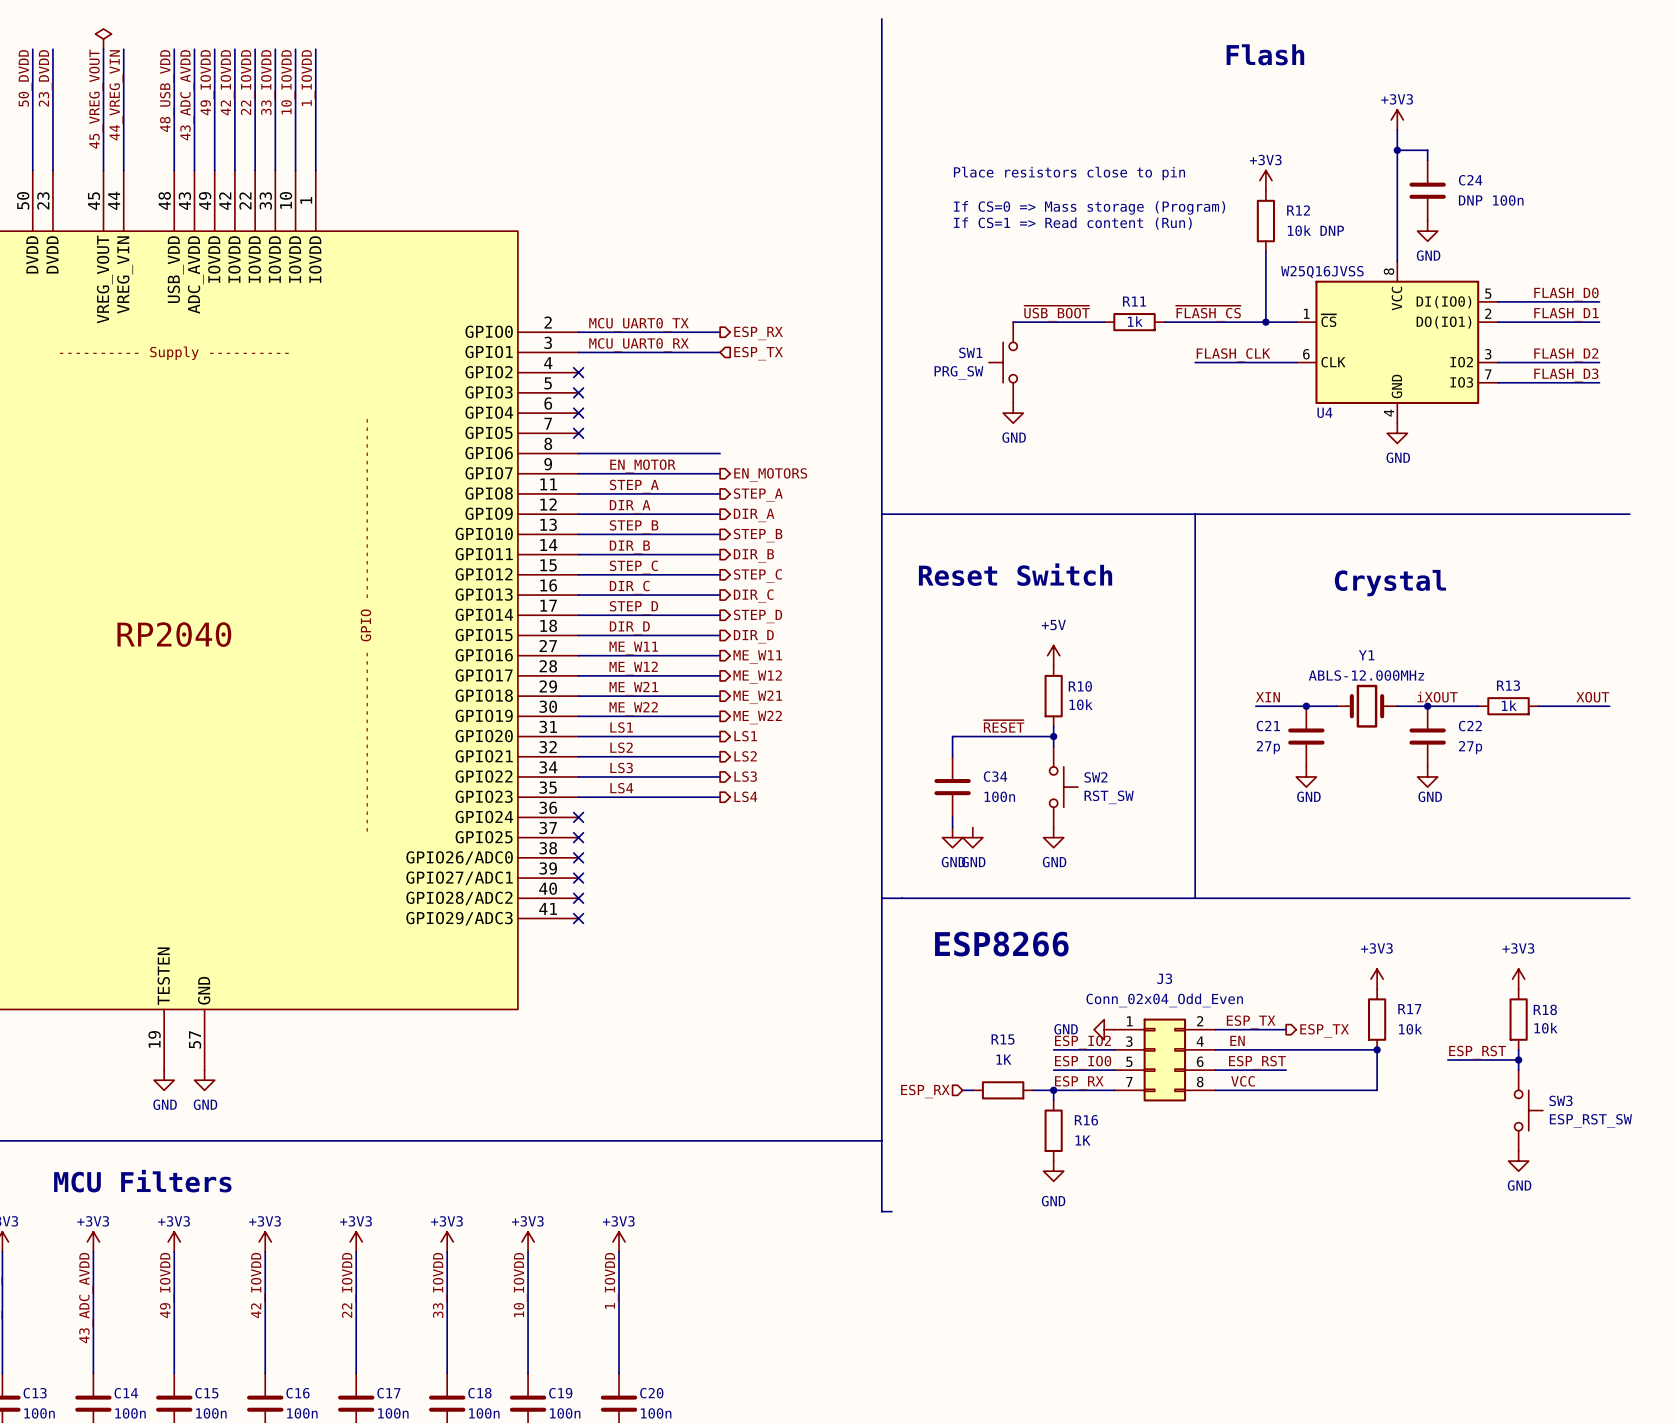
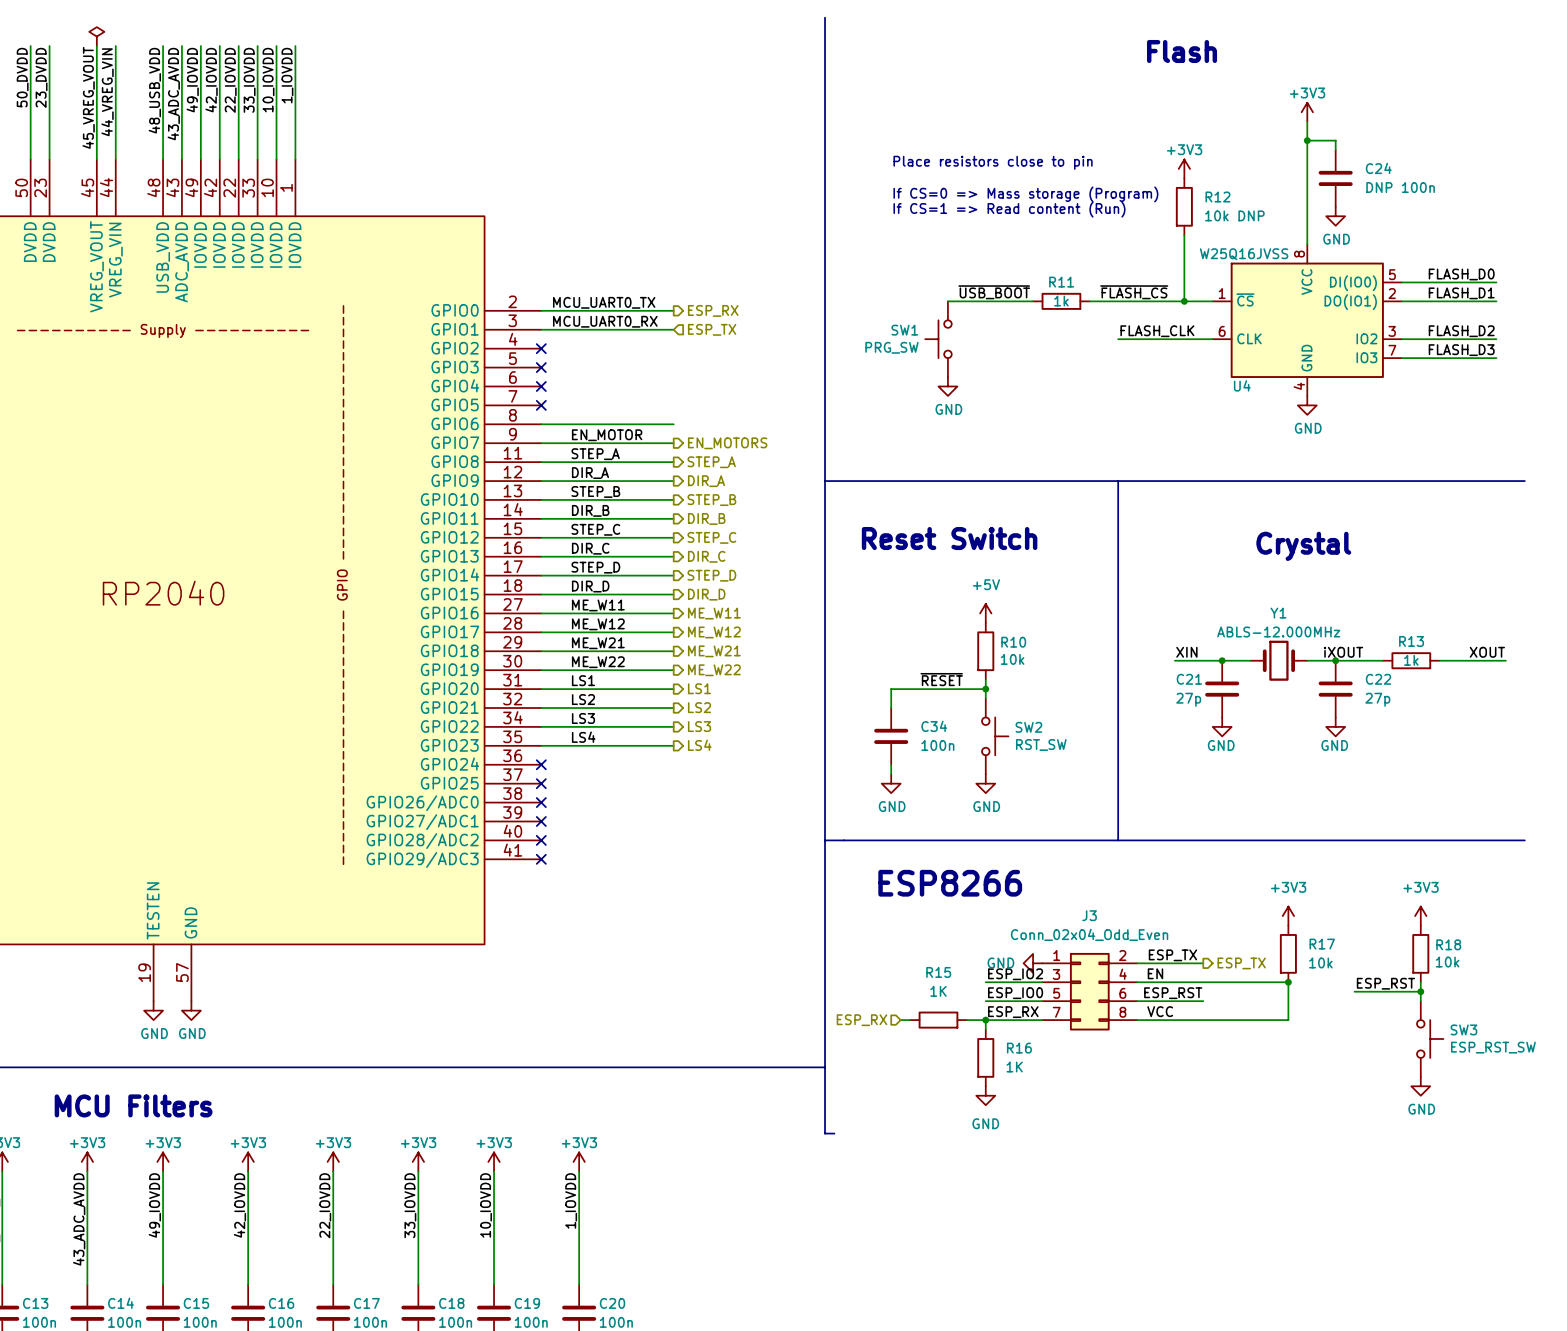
power symbol: GND (972, 837) -> none

